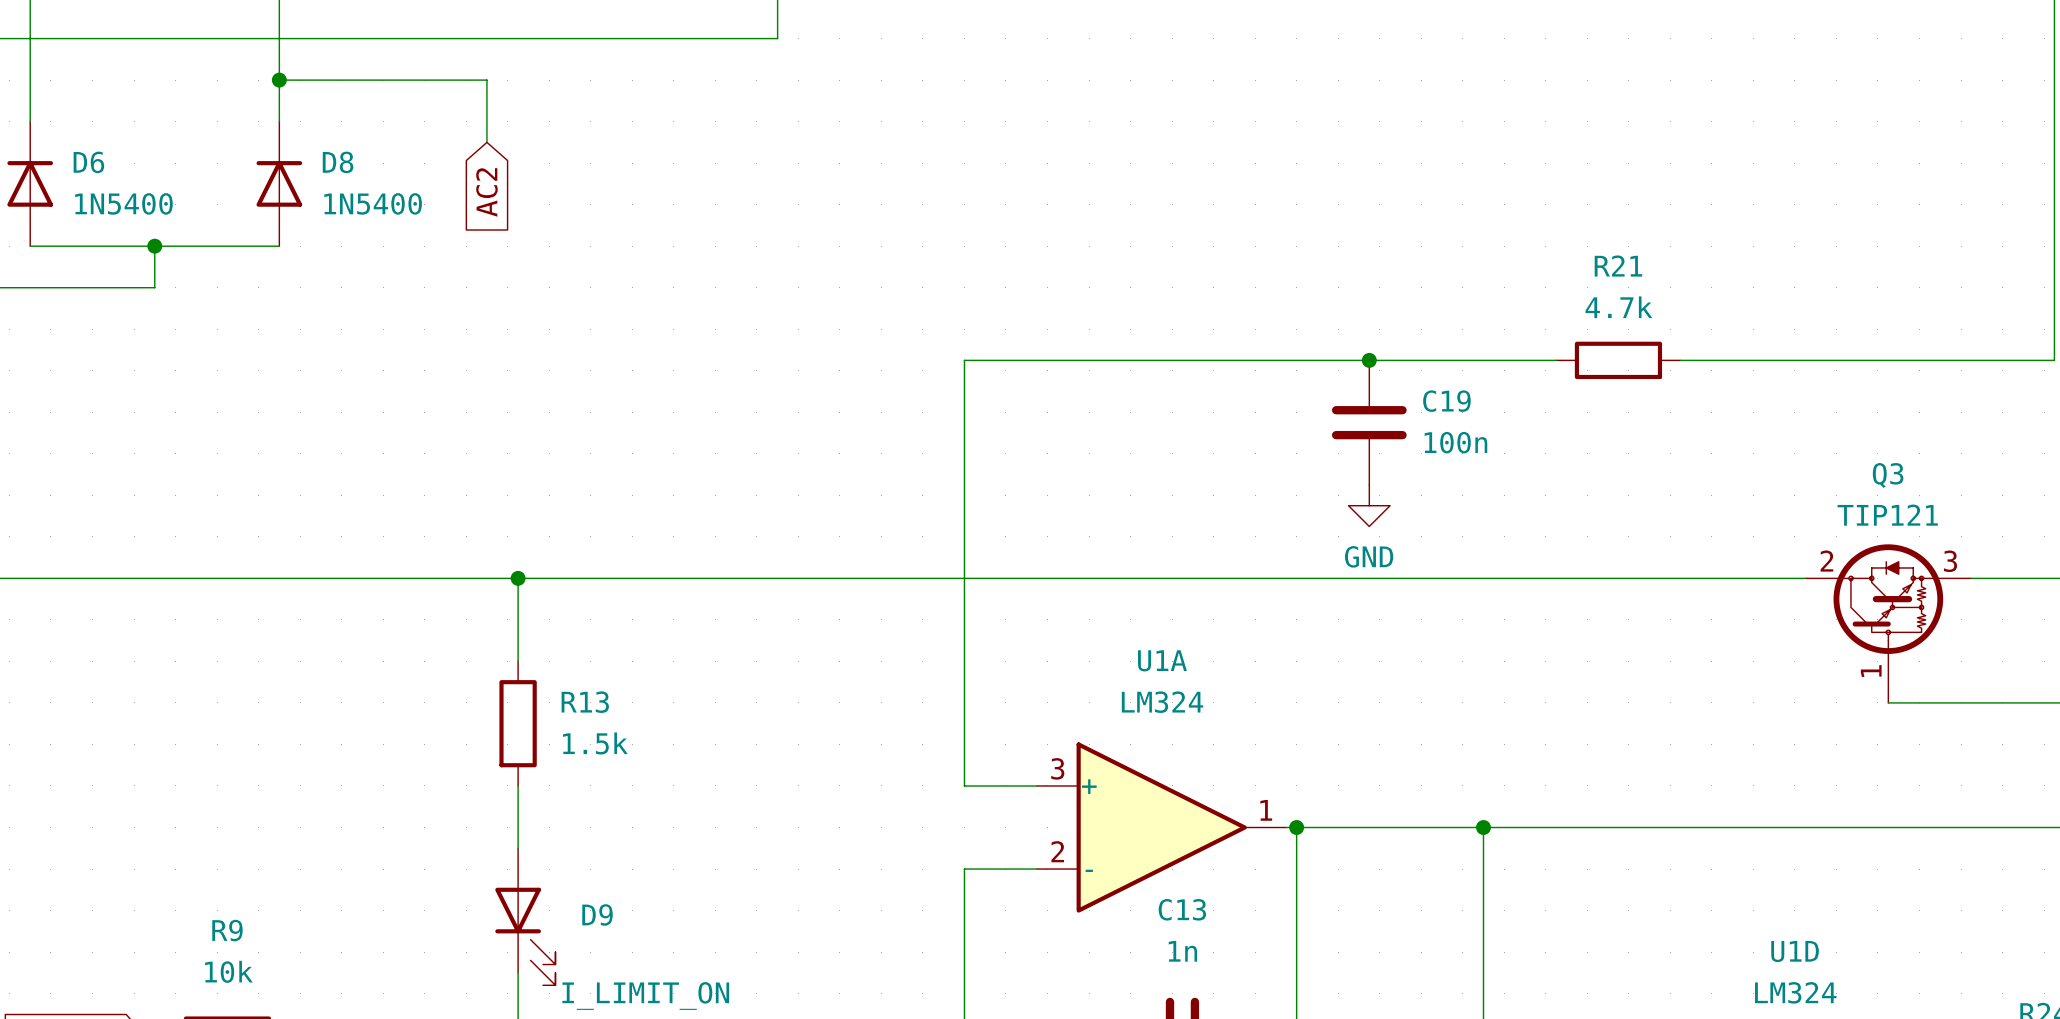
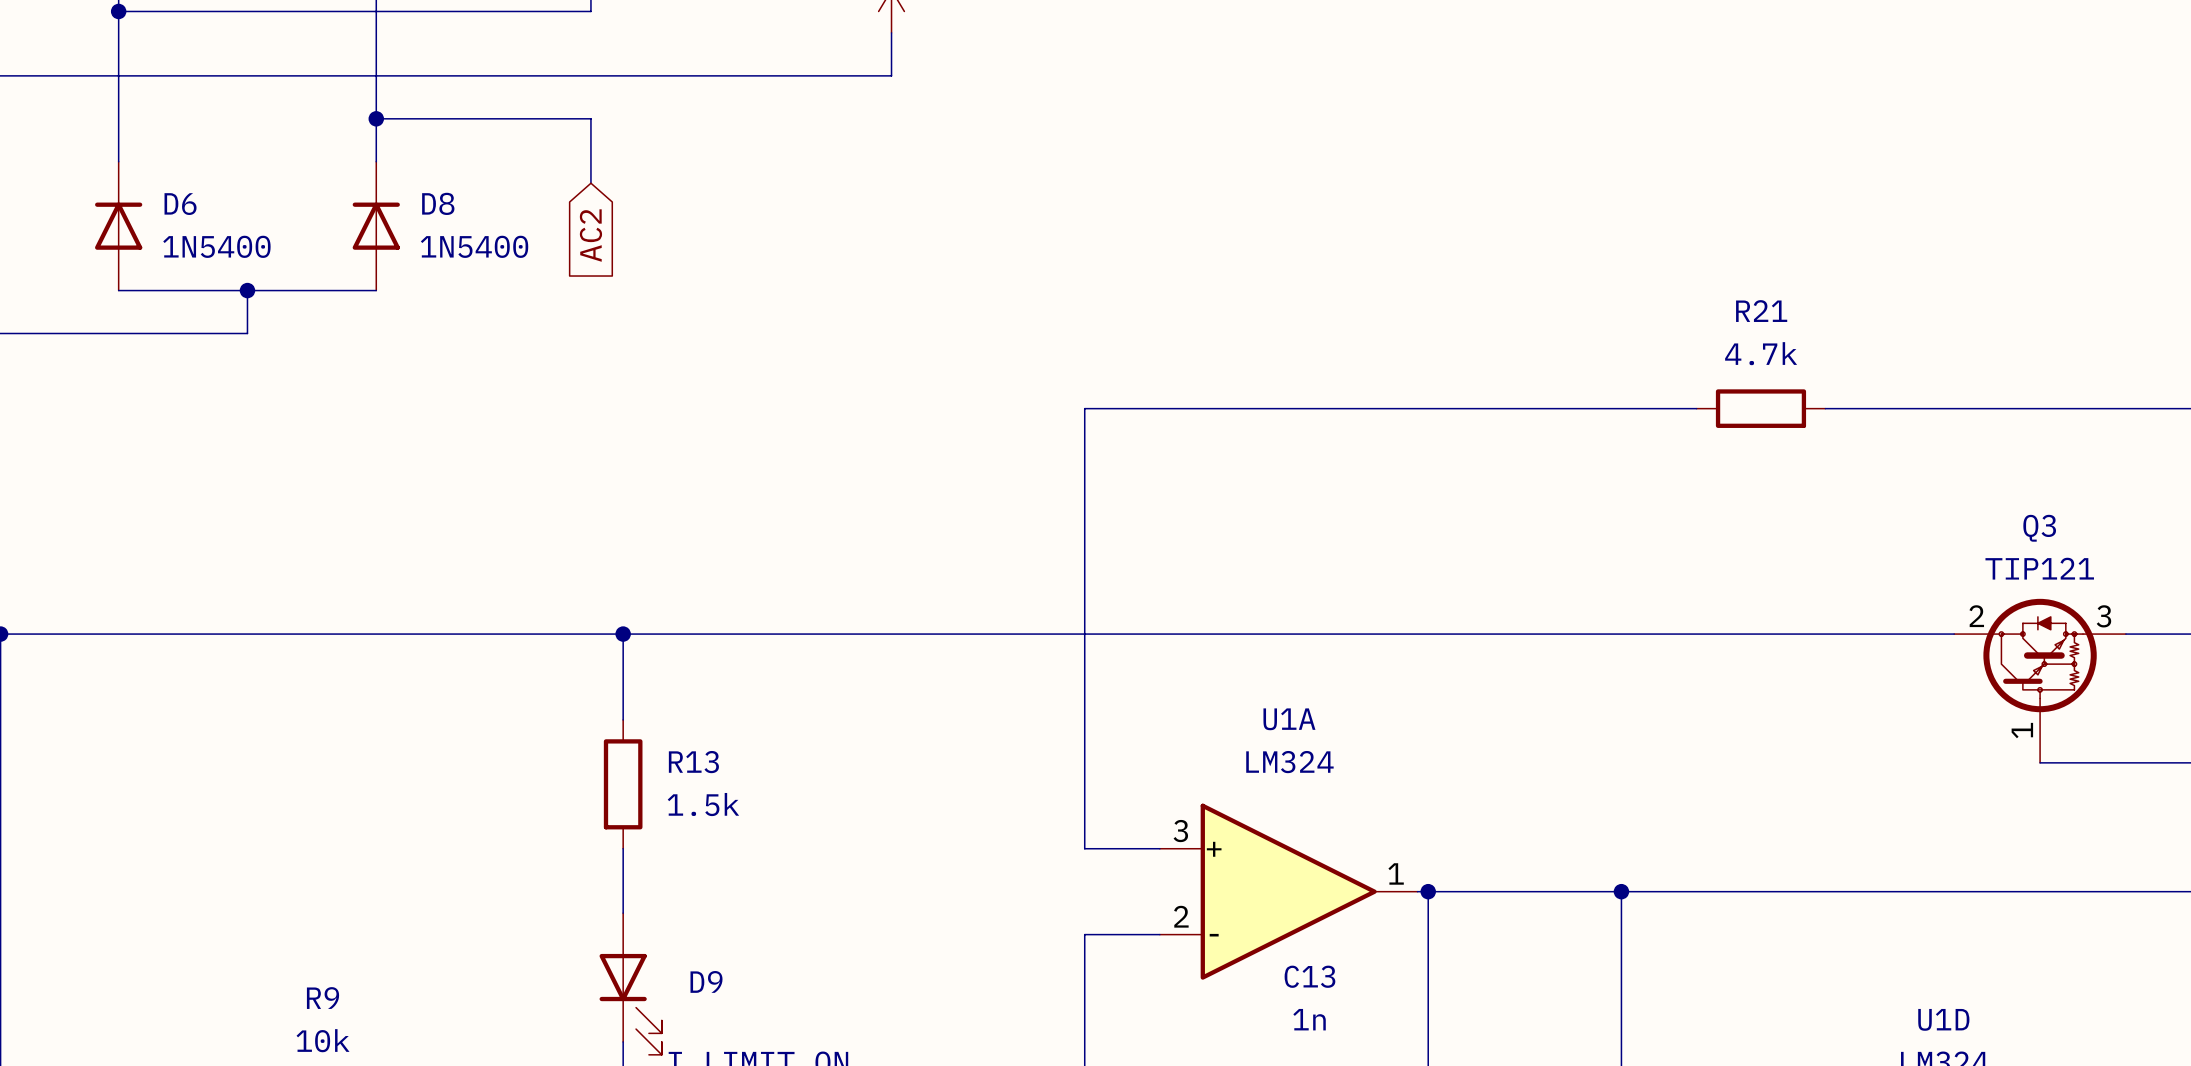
junction: (1369, 360) -> none
C19: 100n (1369, 422) -> none
power symbol: GND (1369, 505) -> none

